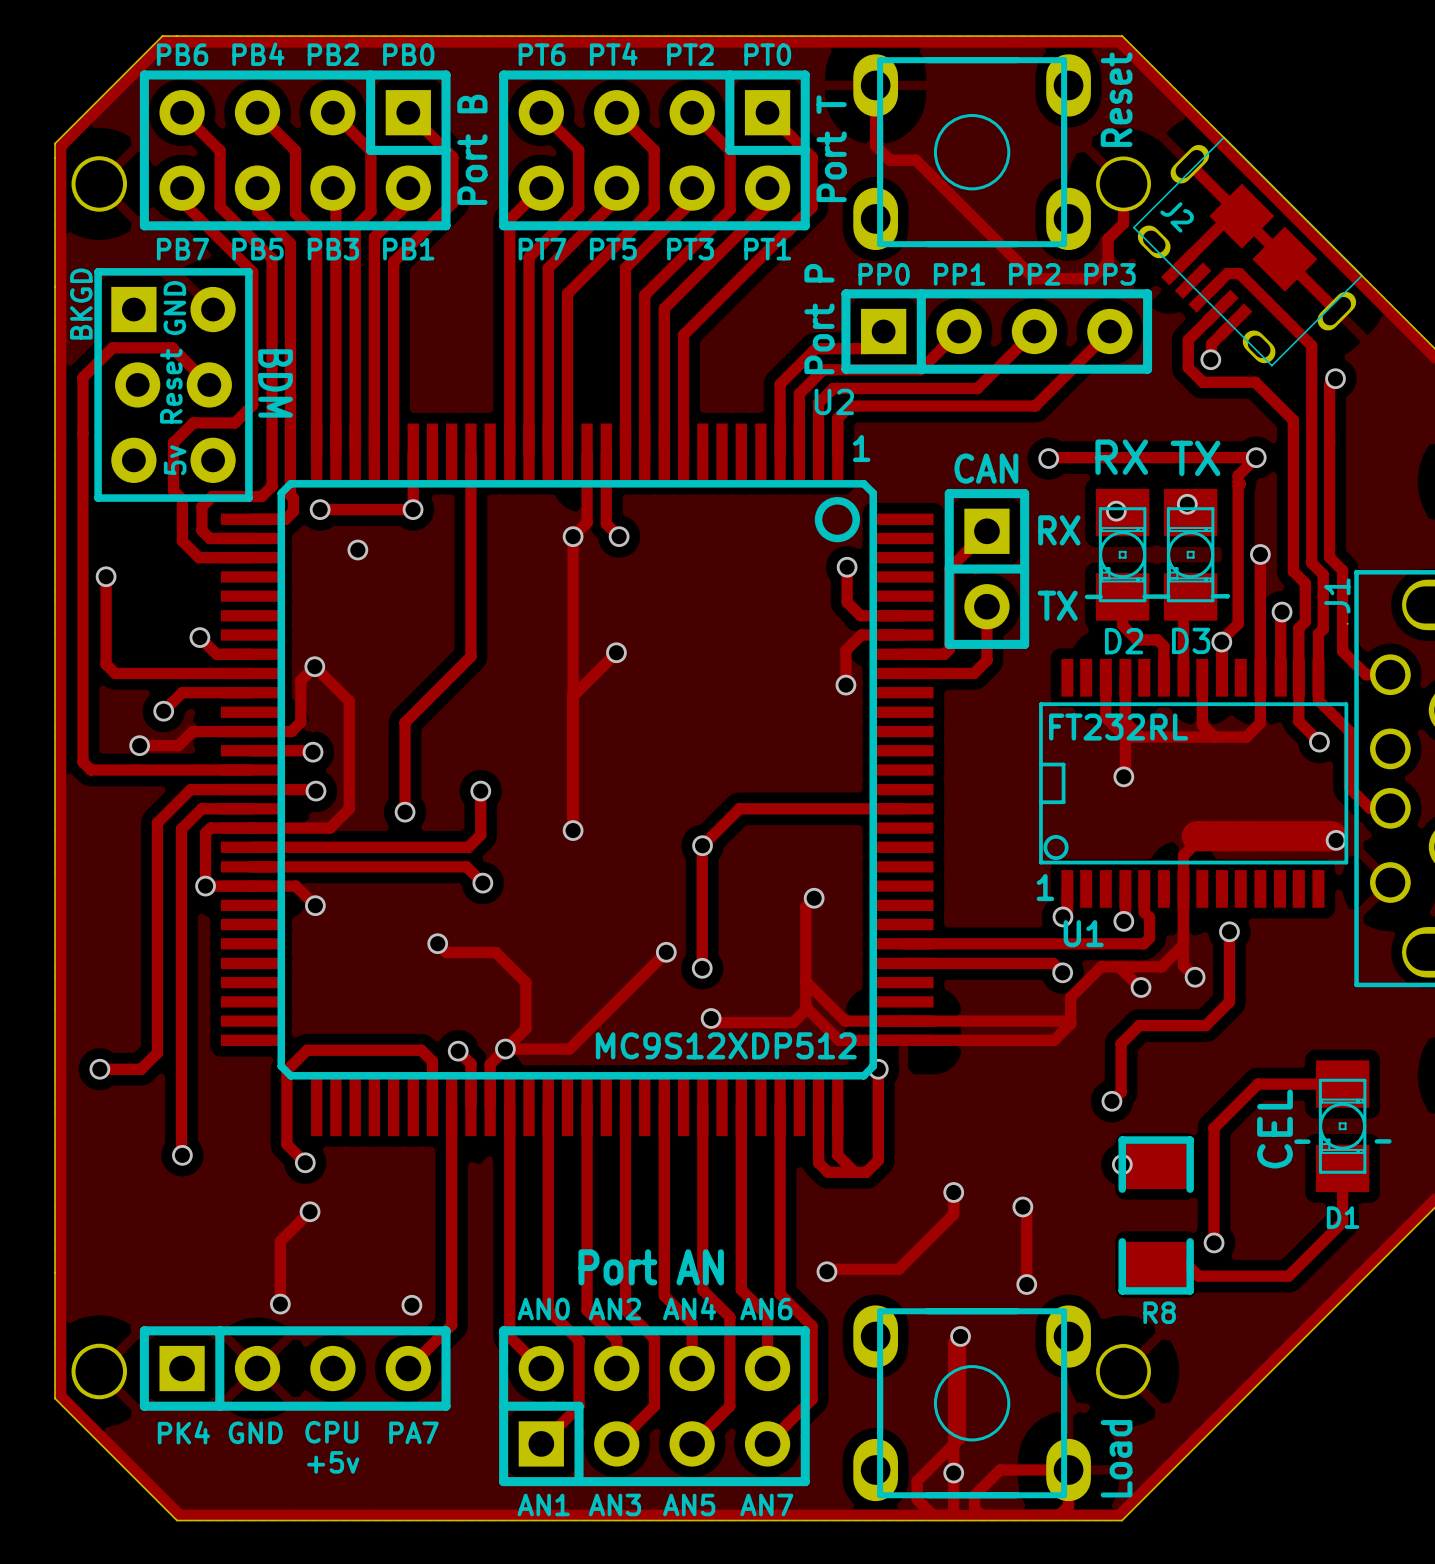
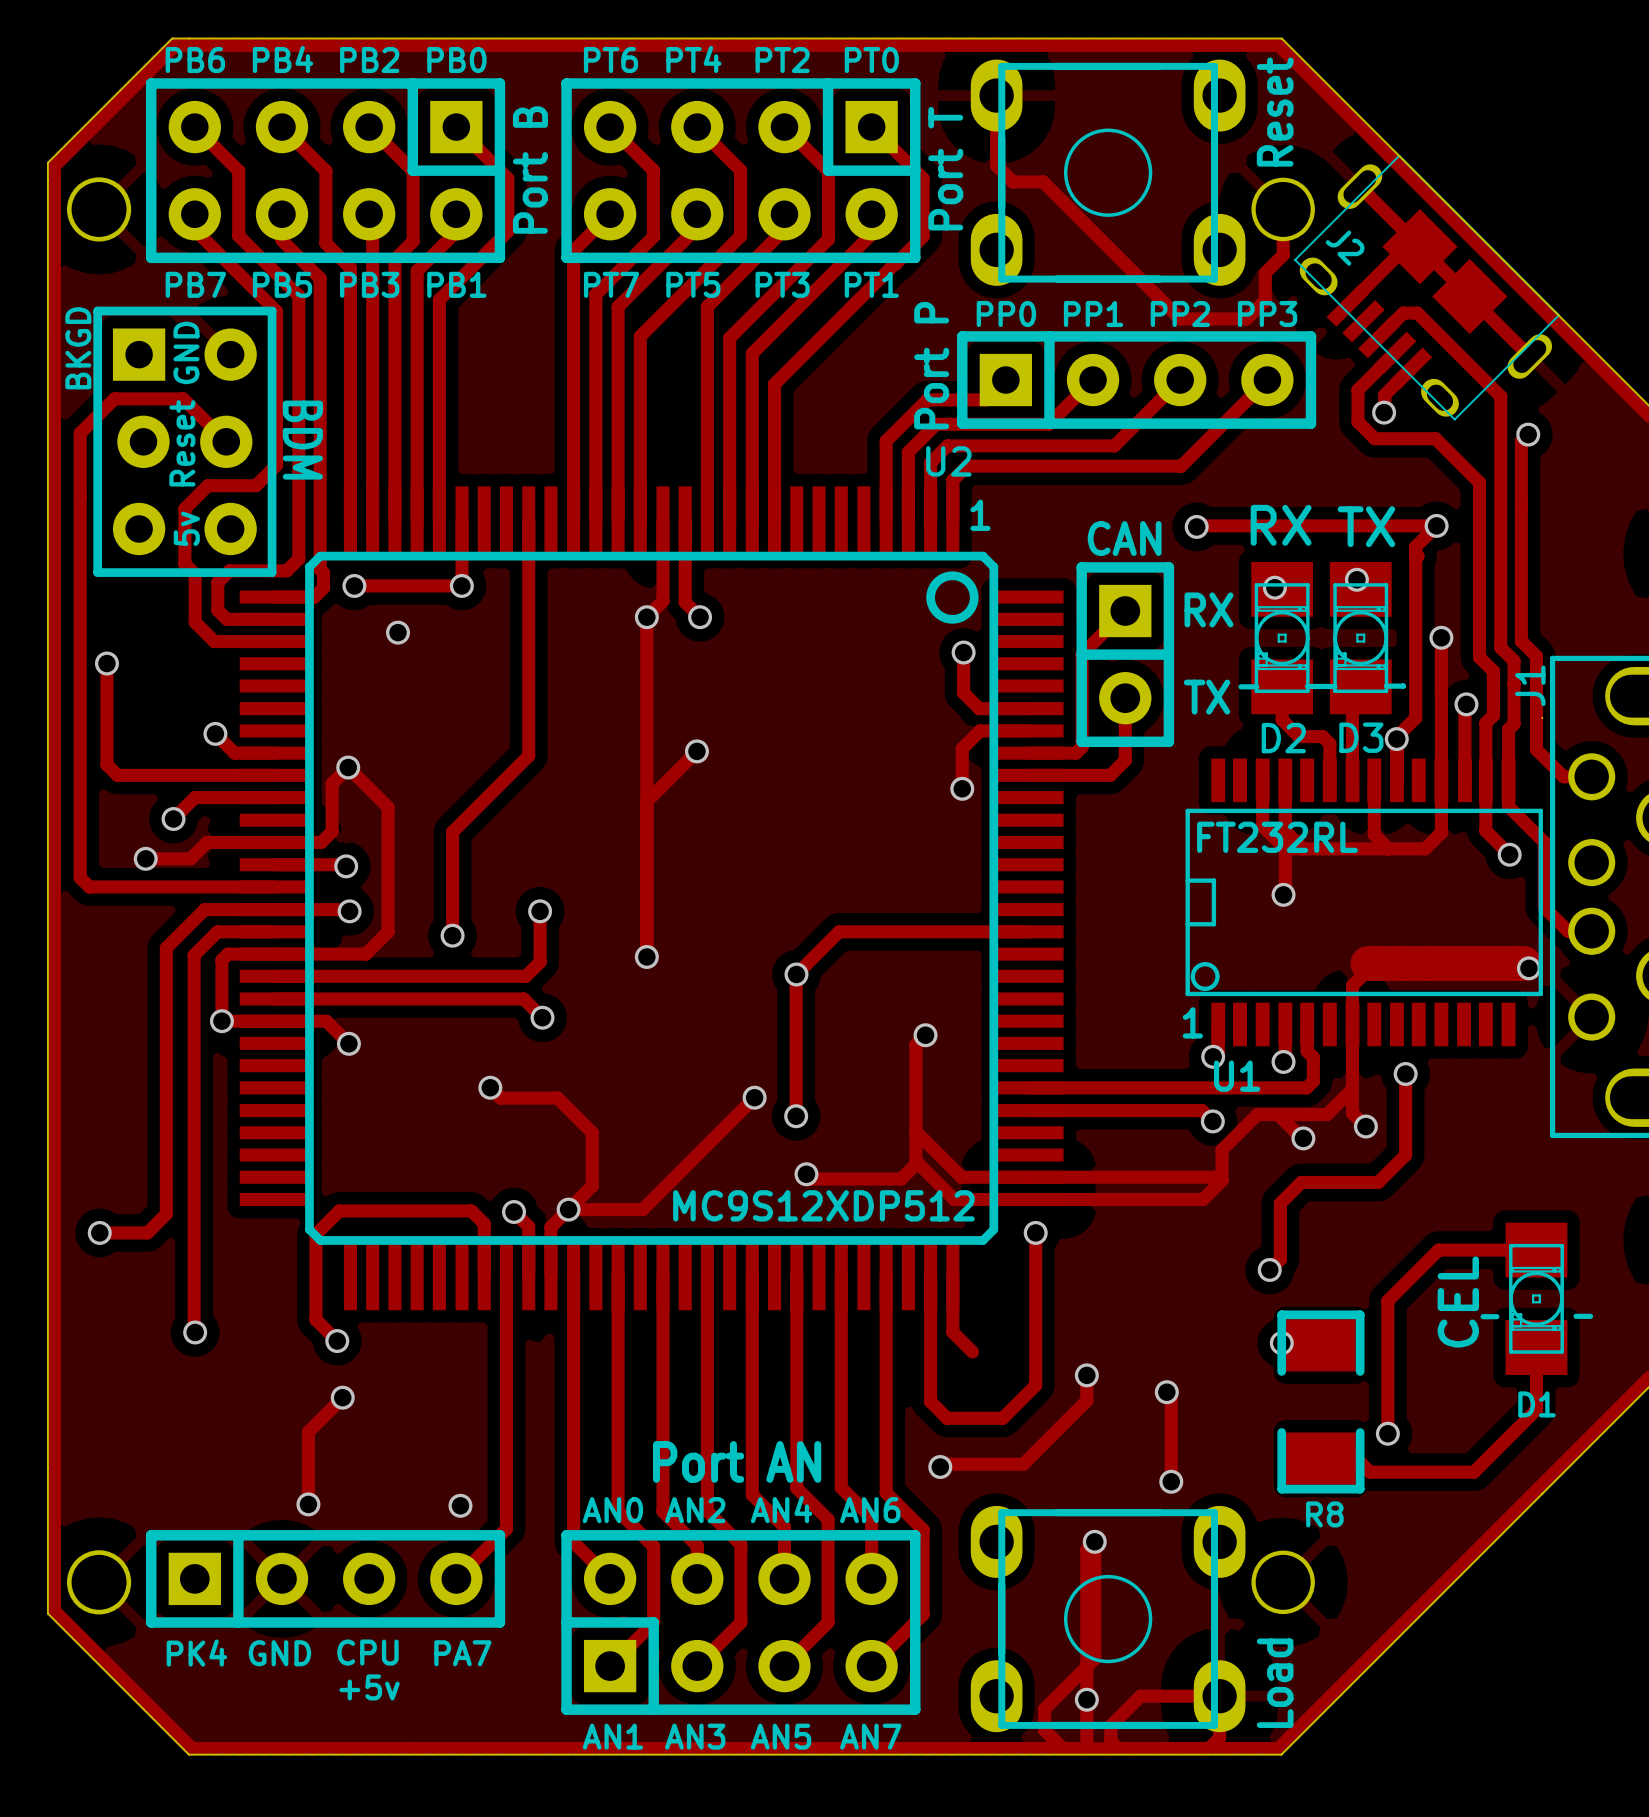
track: (878, 1069) (878, 1160) (866, 1172) (828, 1172) (818, 1162) -> (1035, 1232) (1035, 1385) (1002, 1418) (947, 1418) (930, 1401) (930, 1340)
via position: (878, 1069) -> (1035, 1232)

